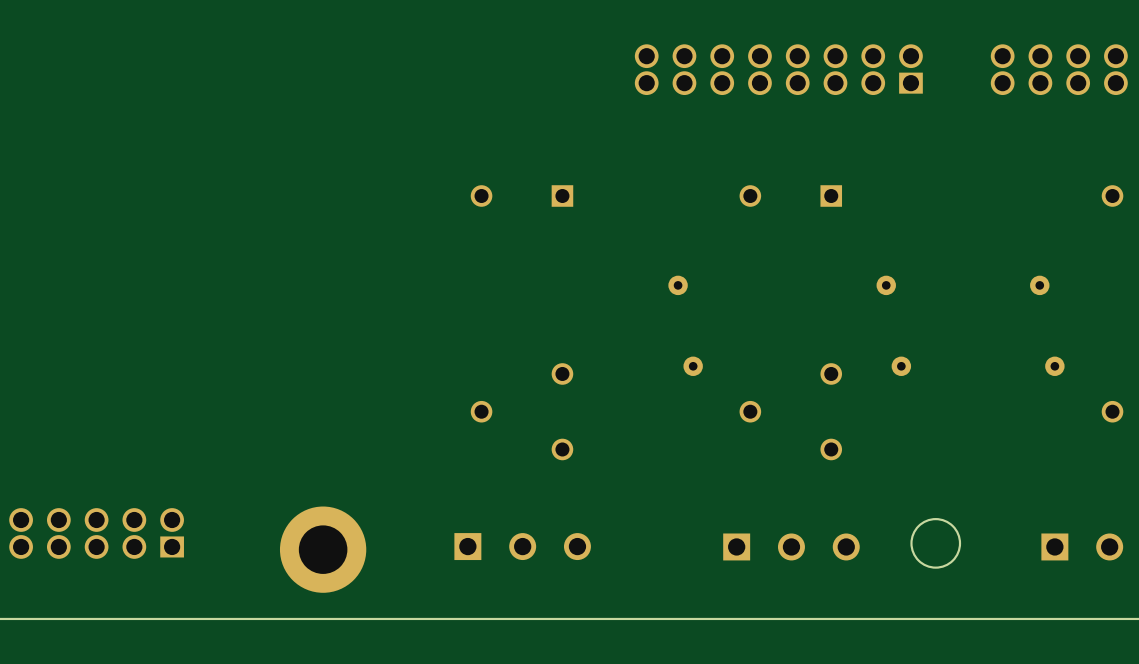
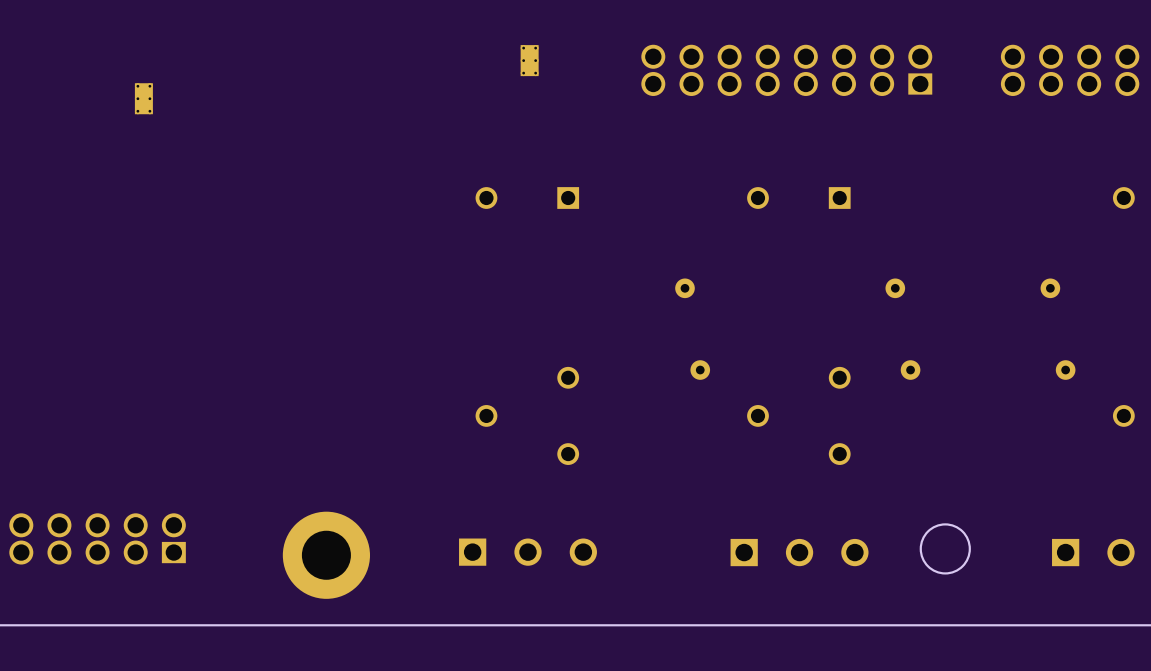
part: none -> (529, 60)
part: none -> (143, 98)

